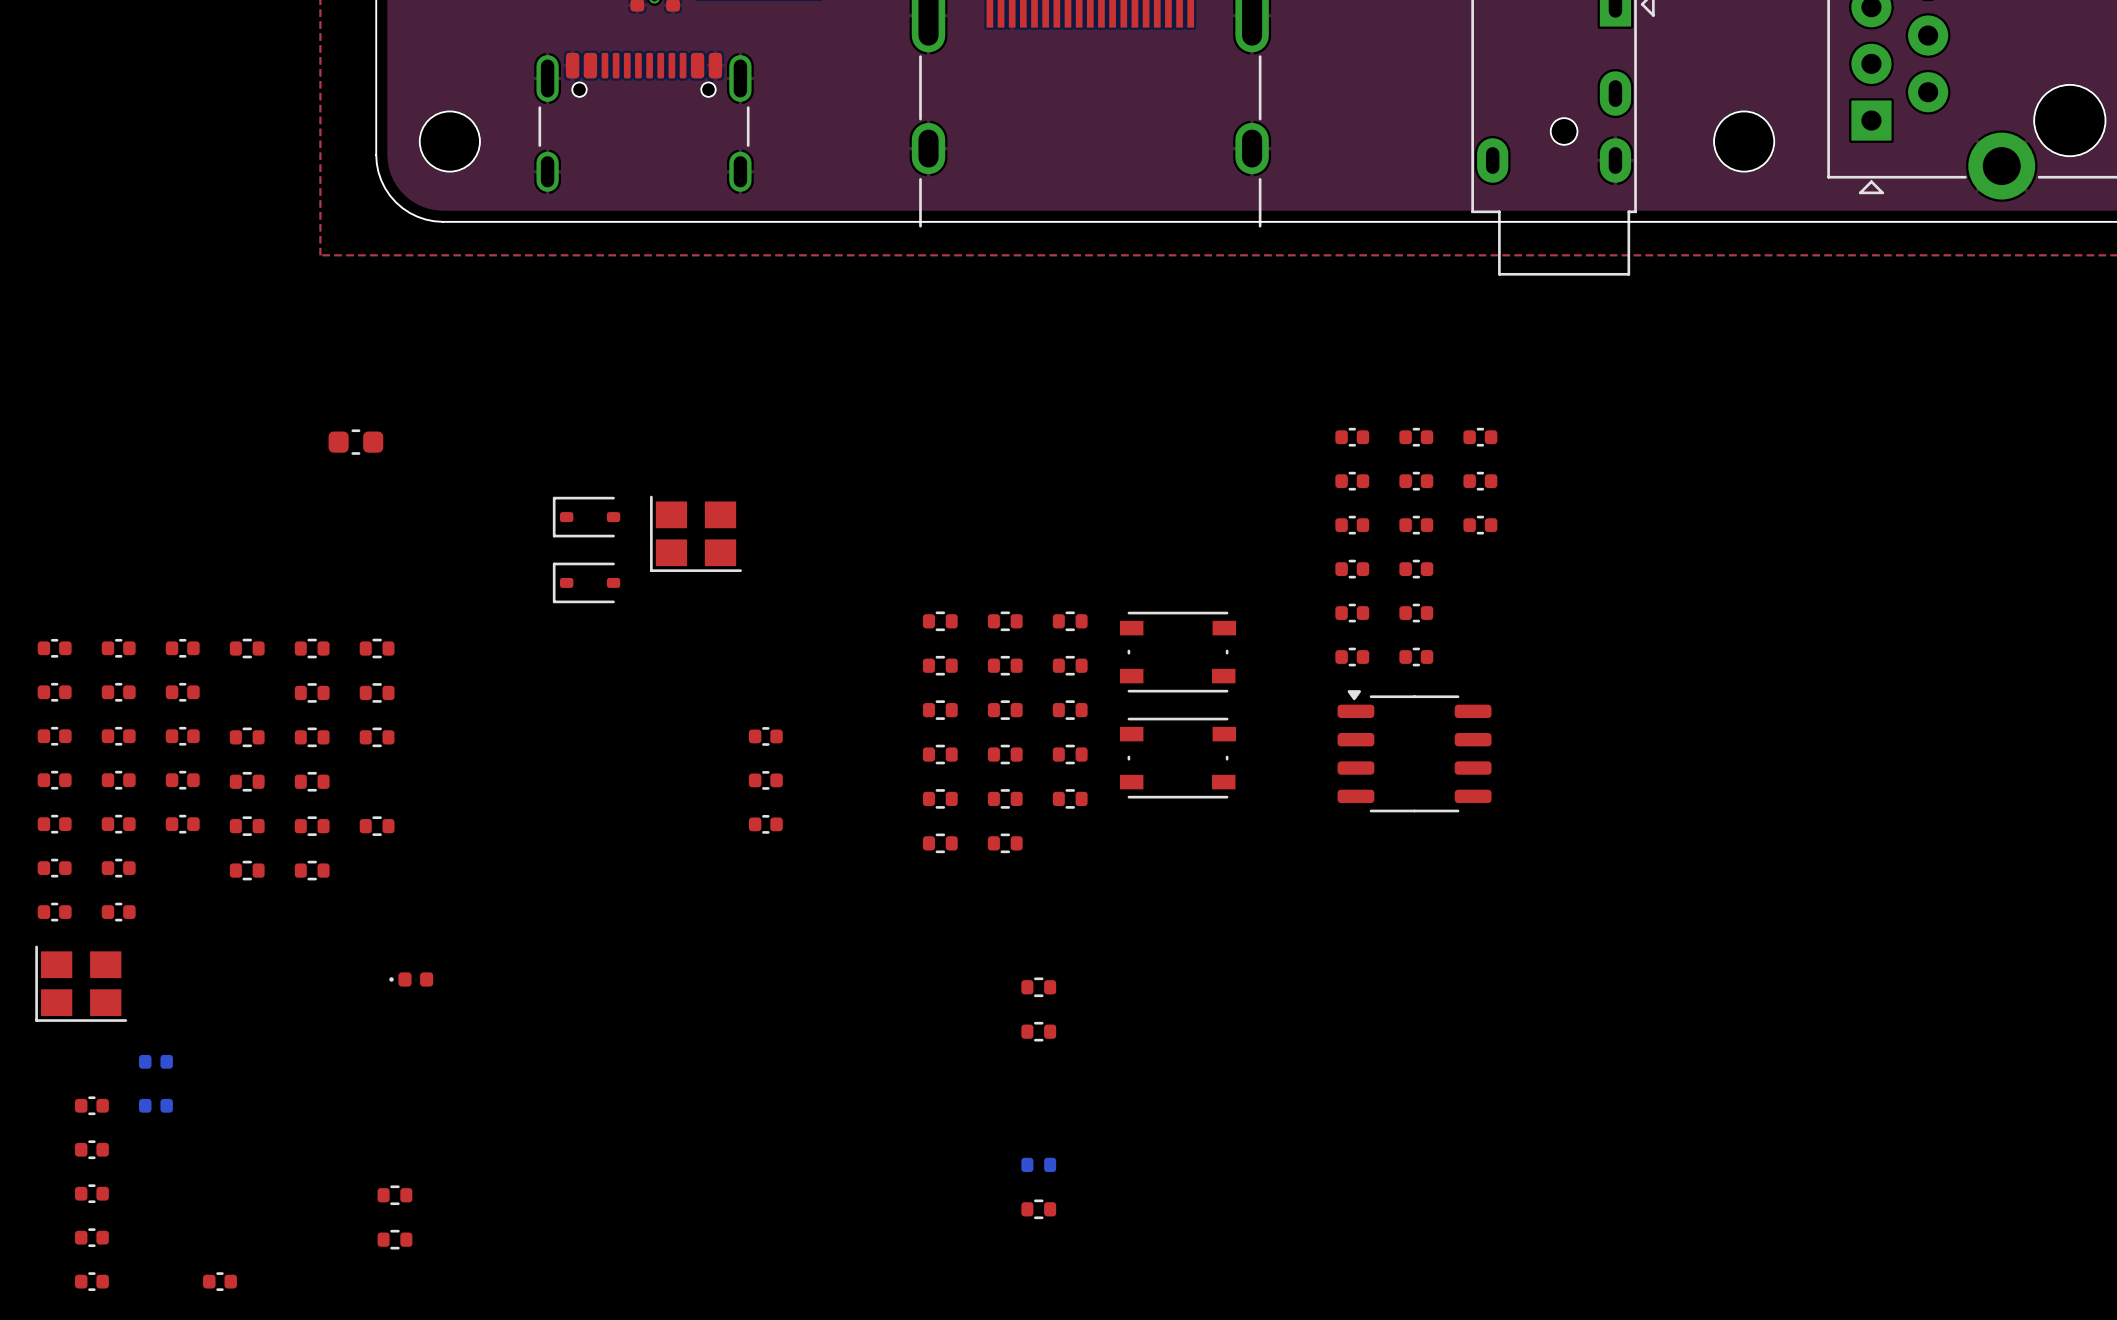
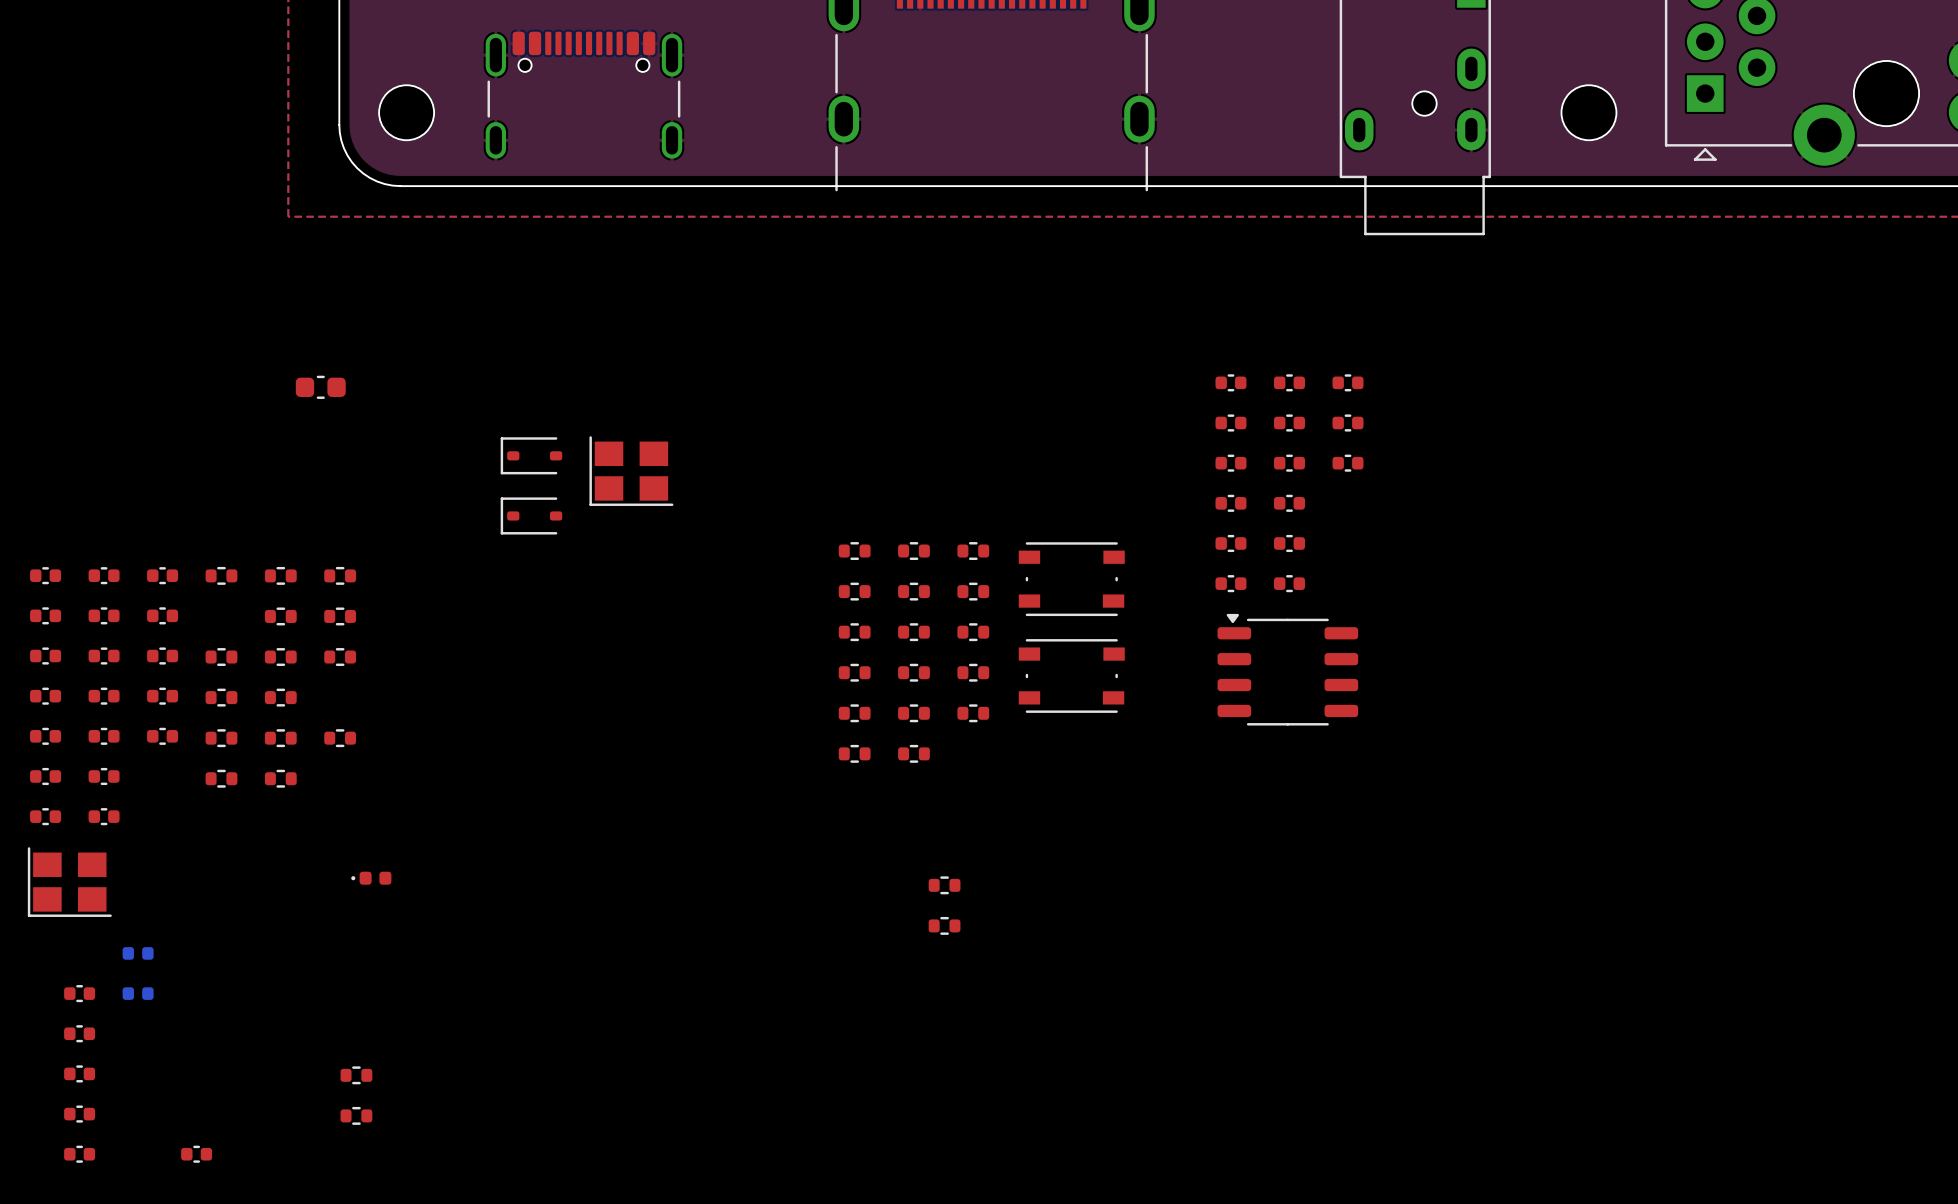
part: (765, 736) -> none
part: (765, 780) -> none
part: (765, 824) -> none
part: (1038, 1164) -> none
part: (1038, 1209) -> none

